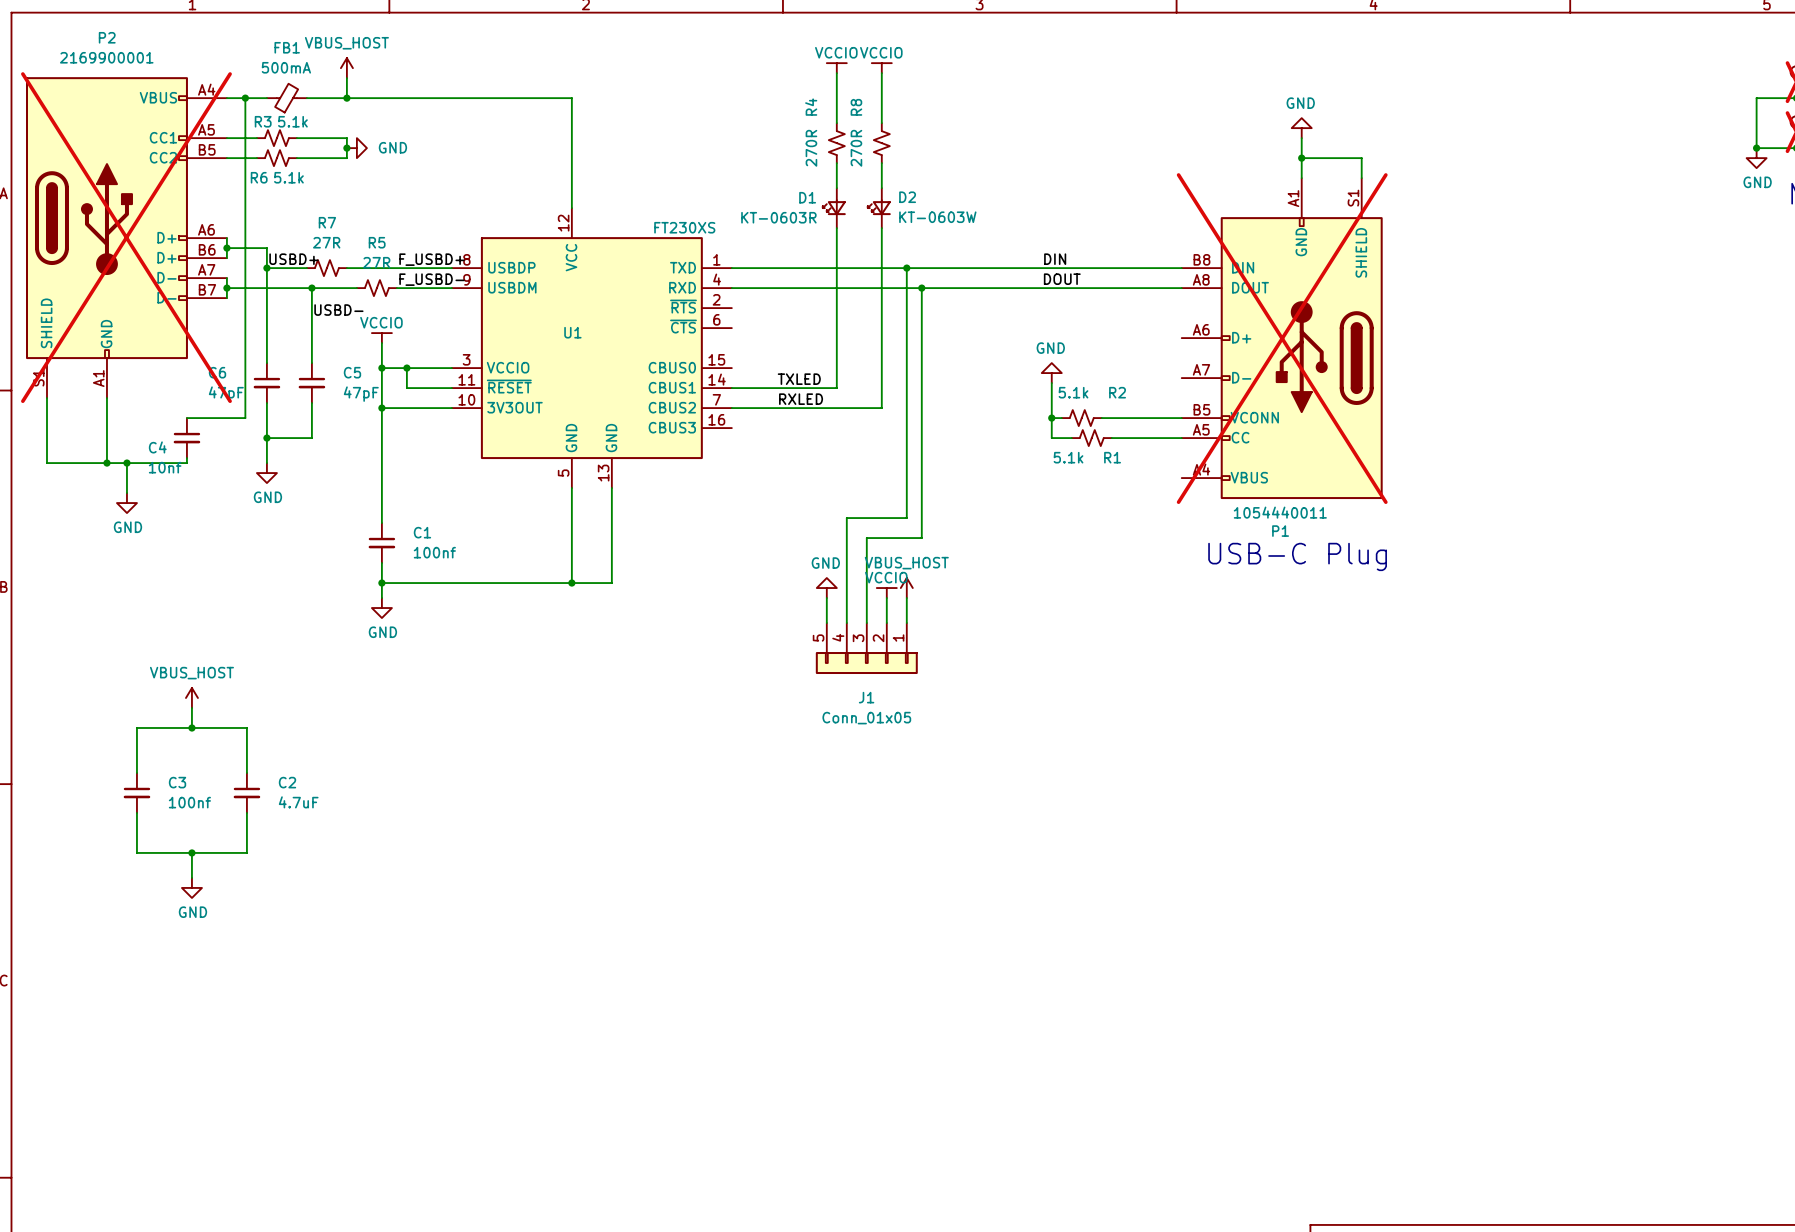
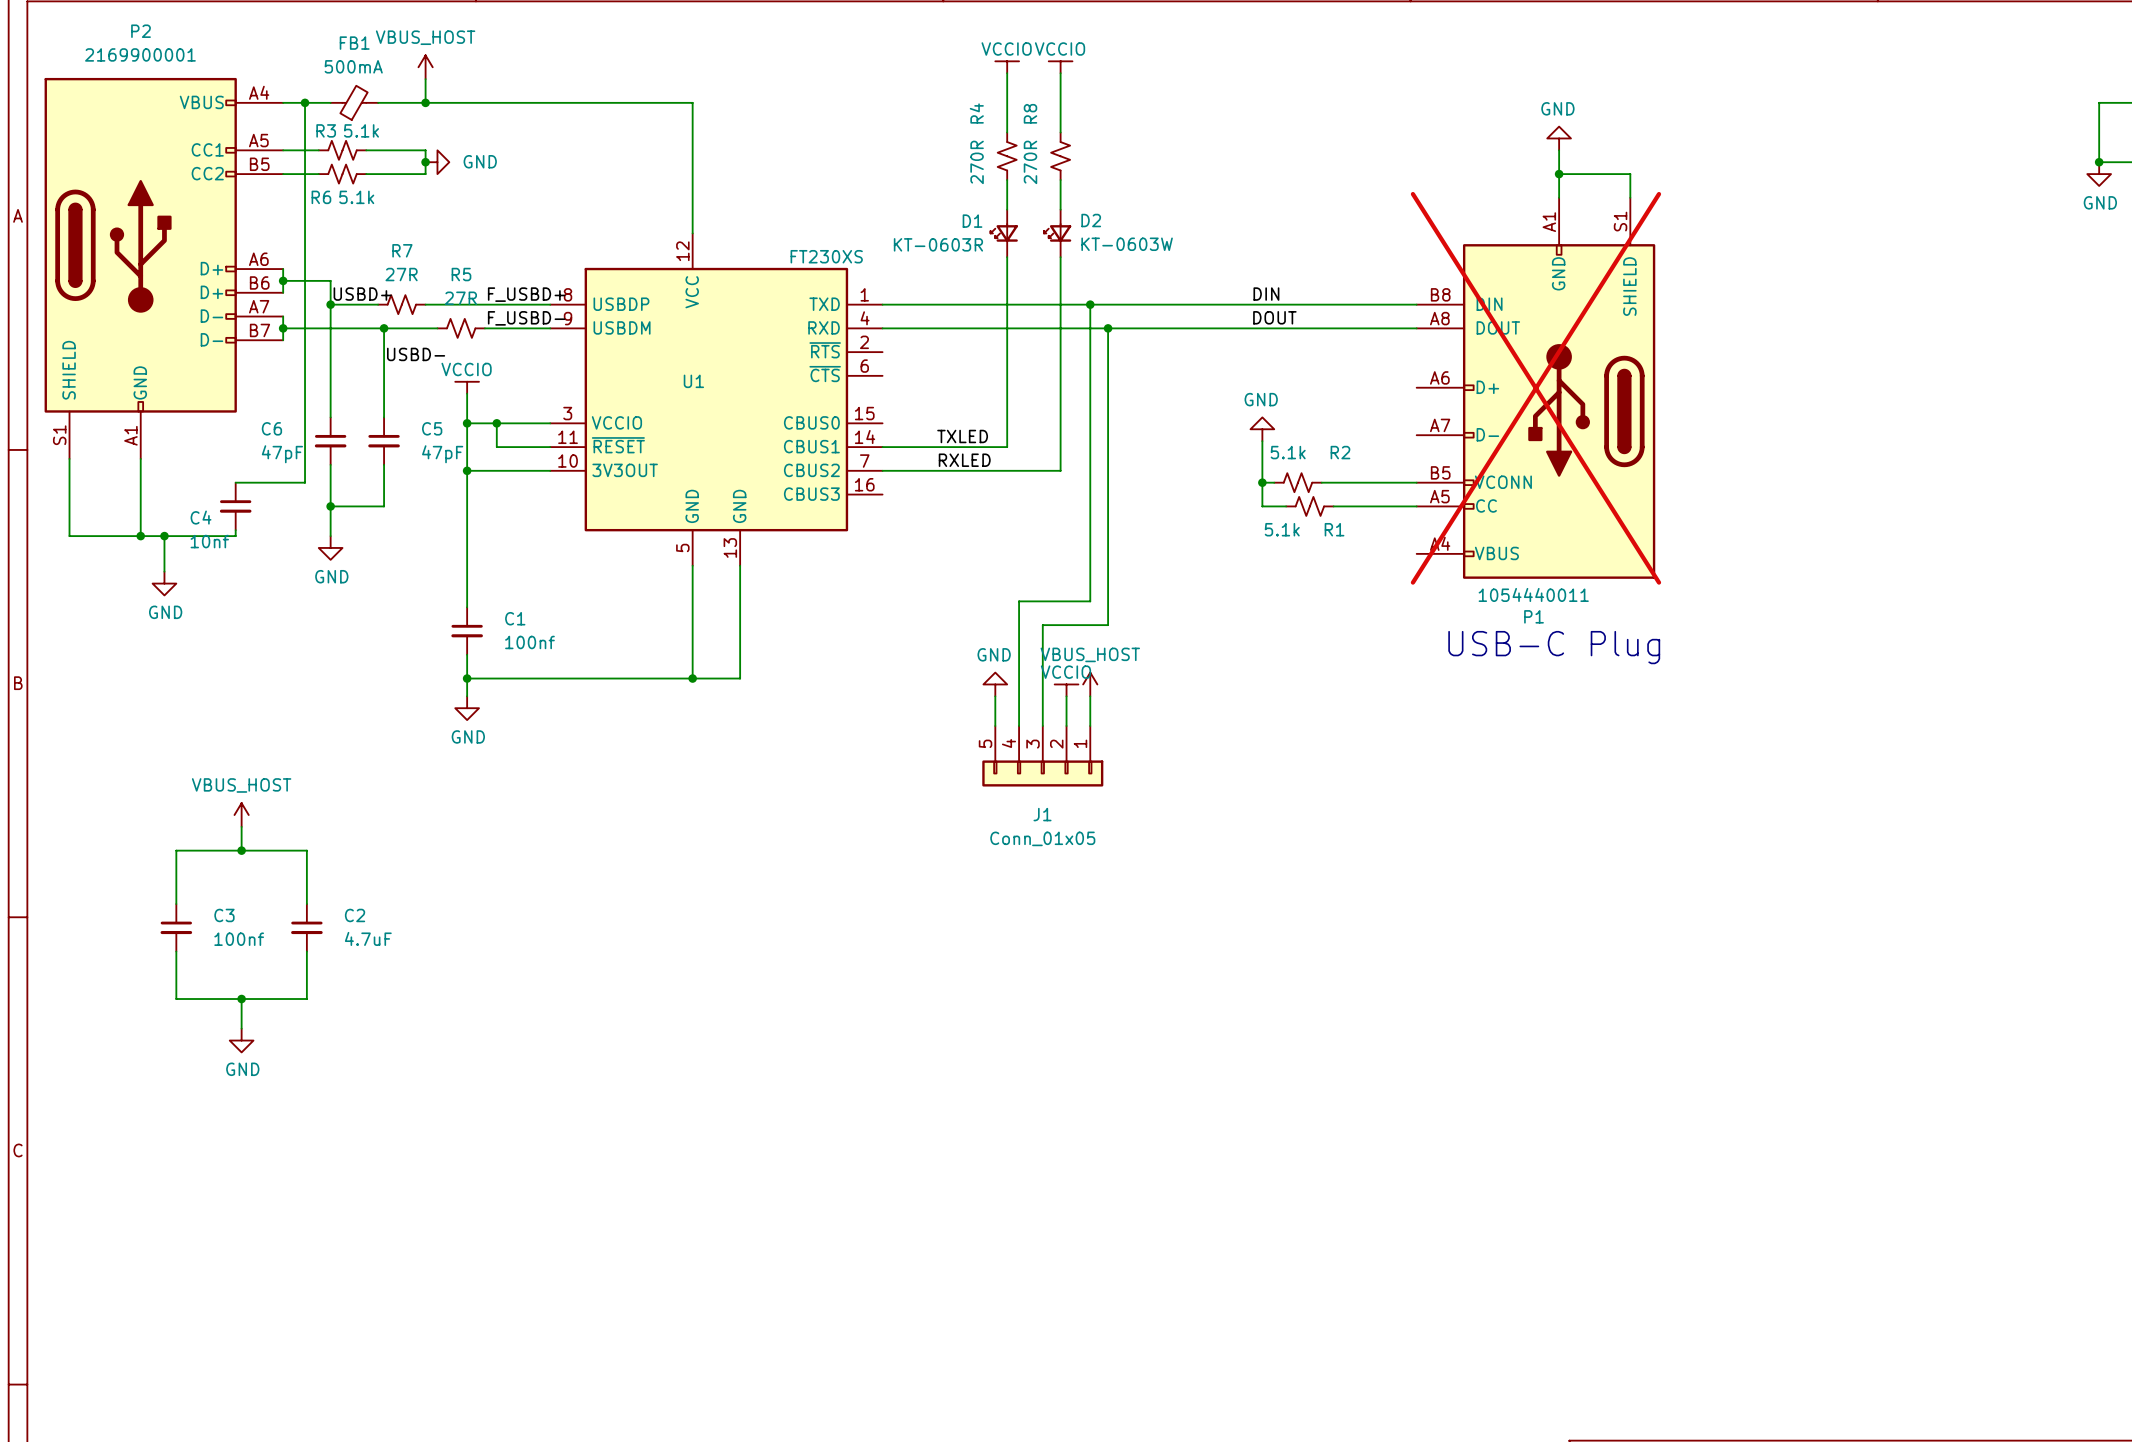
P2 do-not-place cross: (126, 237) -> none

